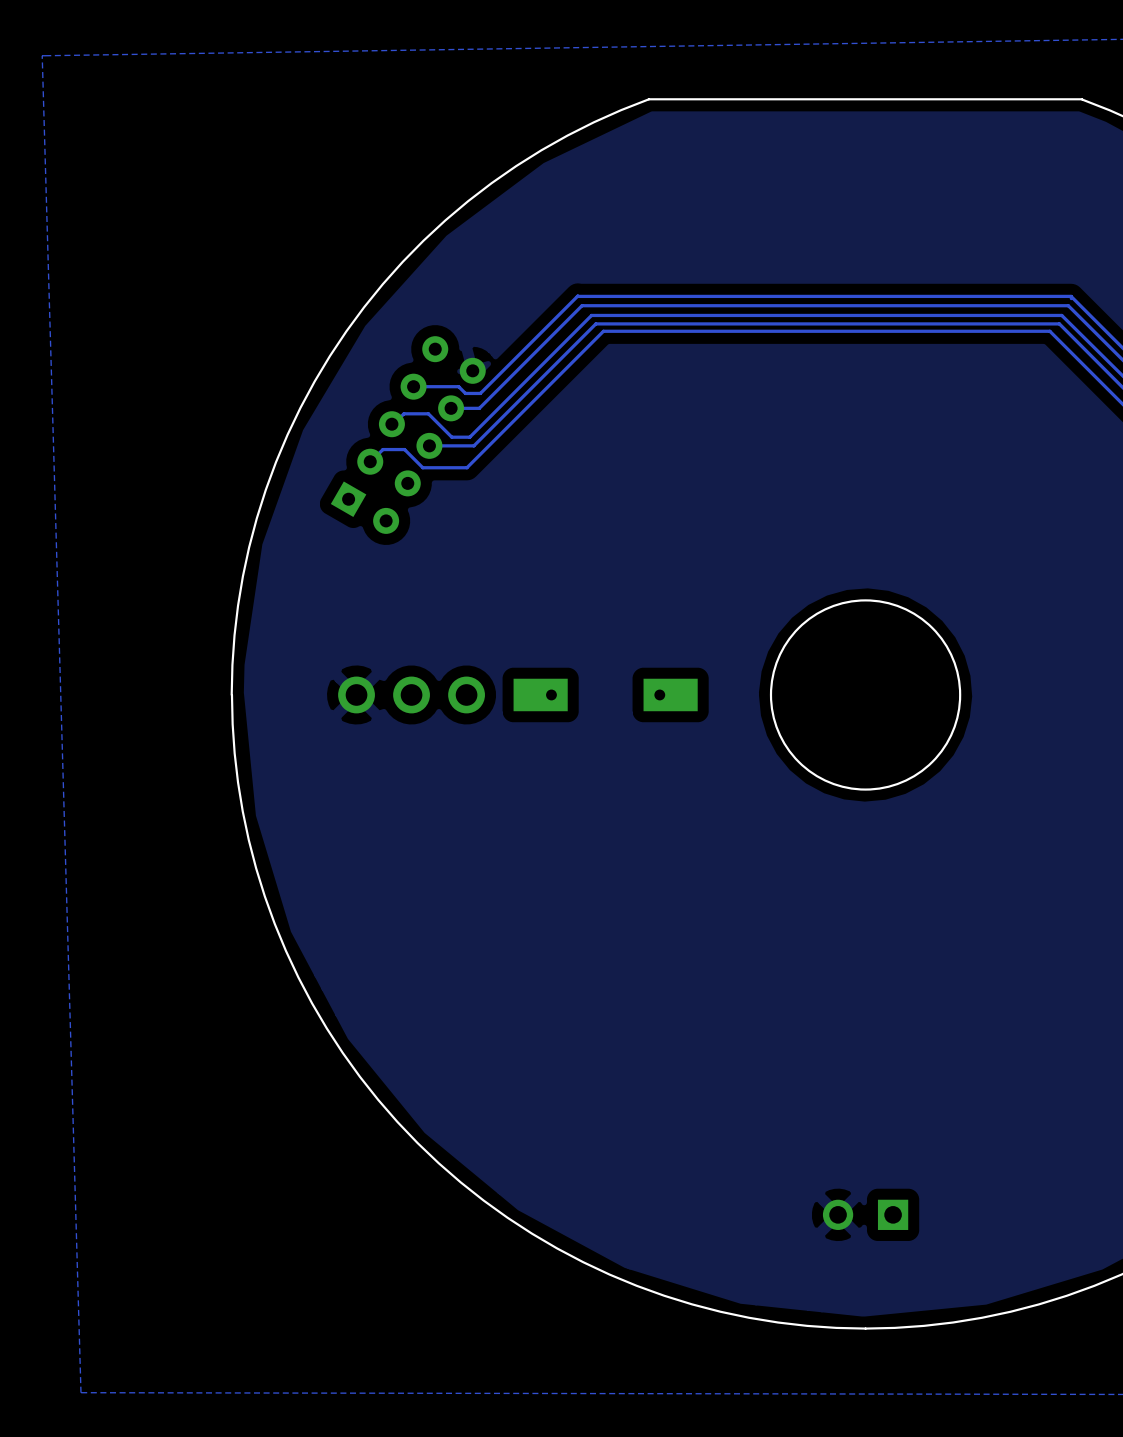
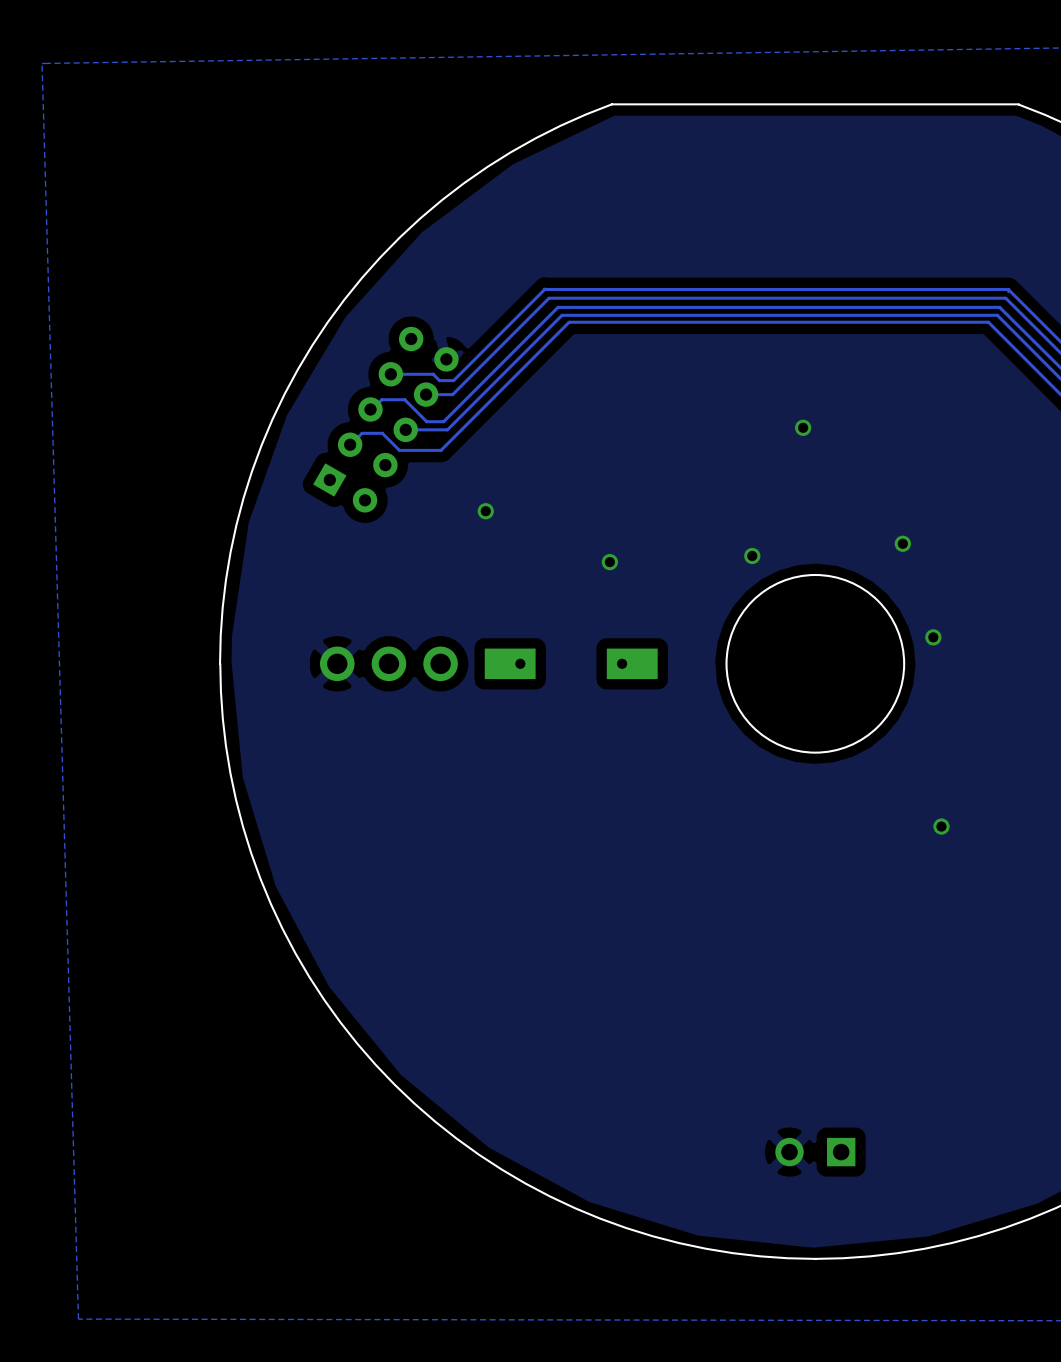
part: none -> (803, 427)
part: none -> (485, 511)
part: none -> (902, 543)
part: none -> (752, 555)
part: none -> (609, 562)
part: none -> (933, 637)
part: none -> (941, 826)

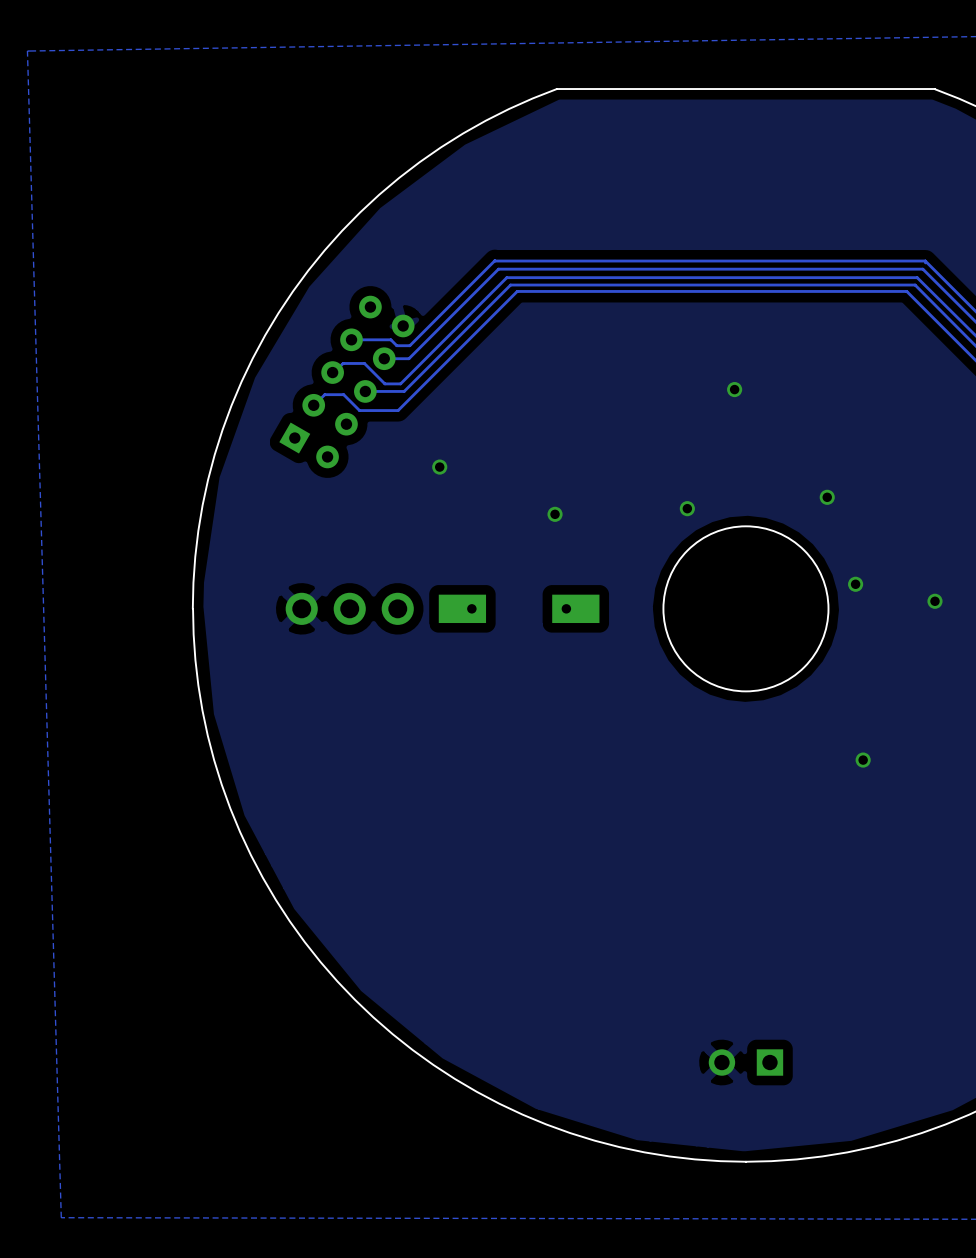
part: none -> (934, 601)

